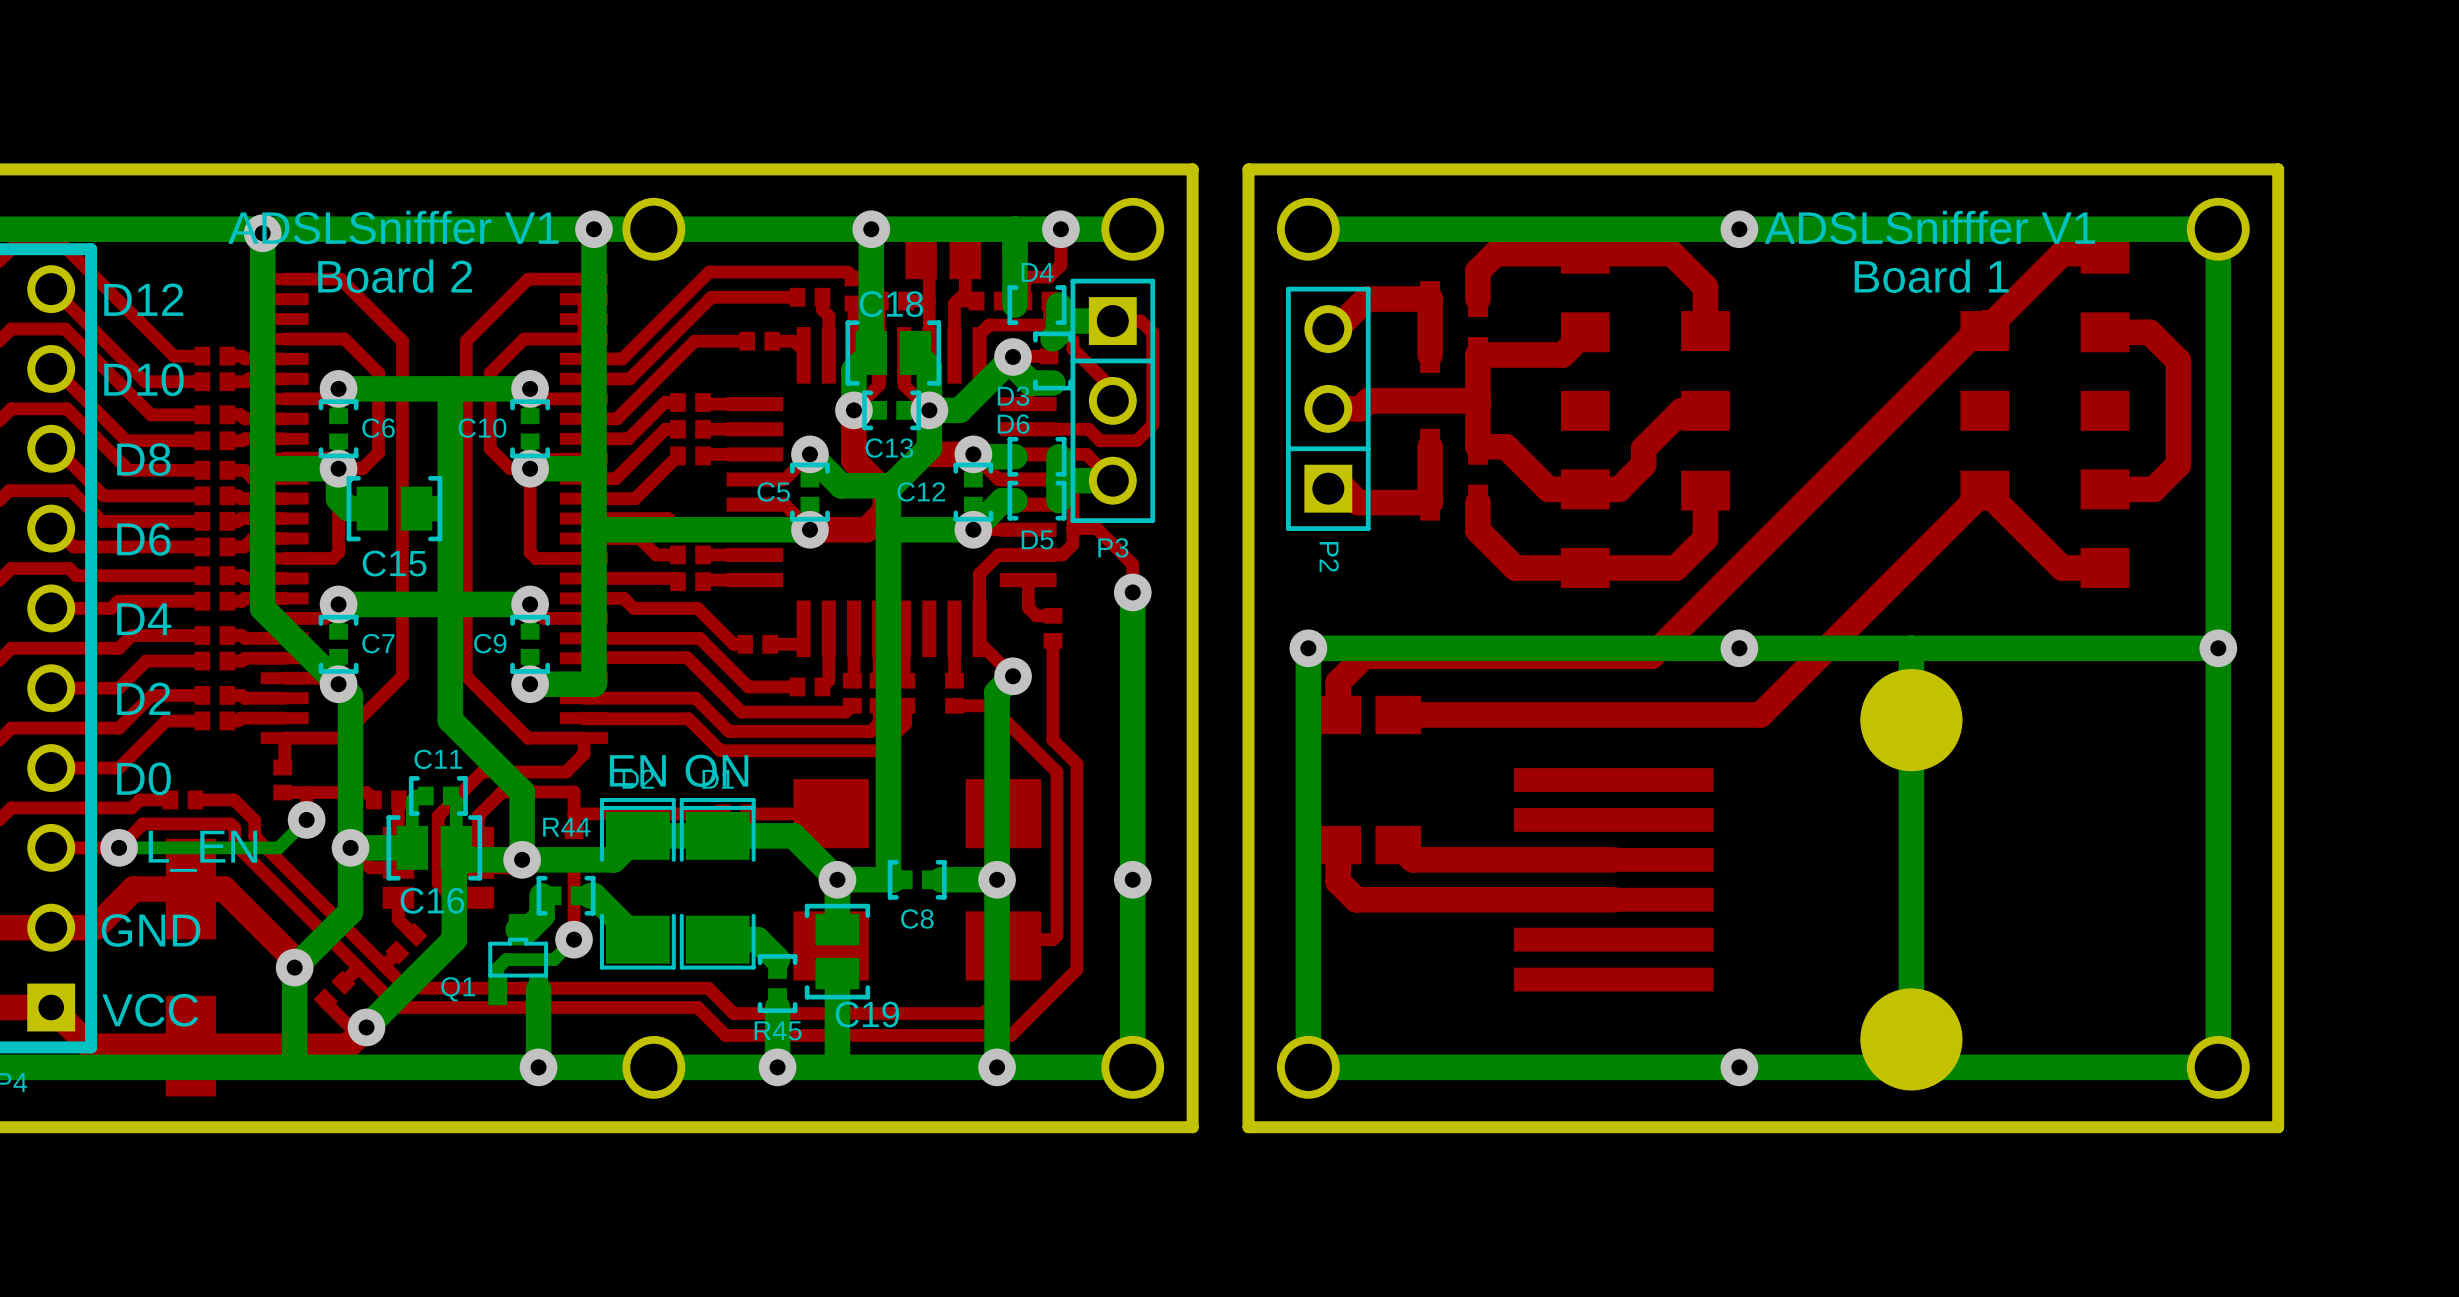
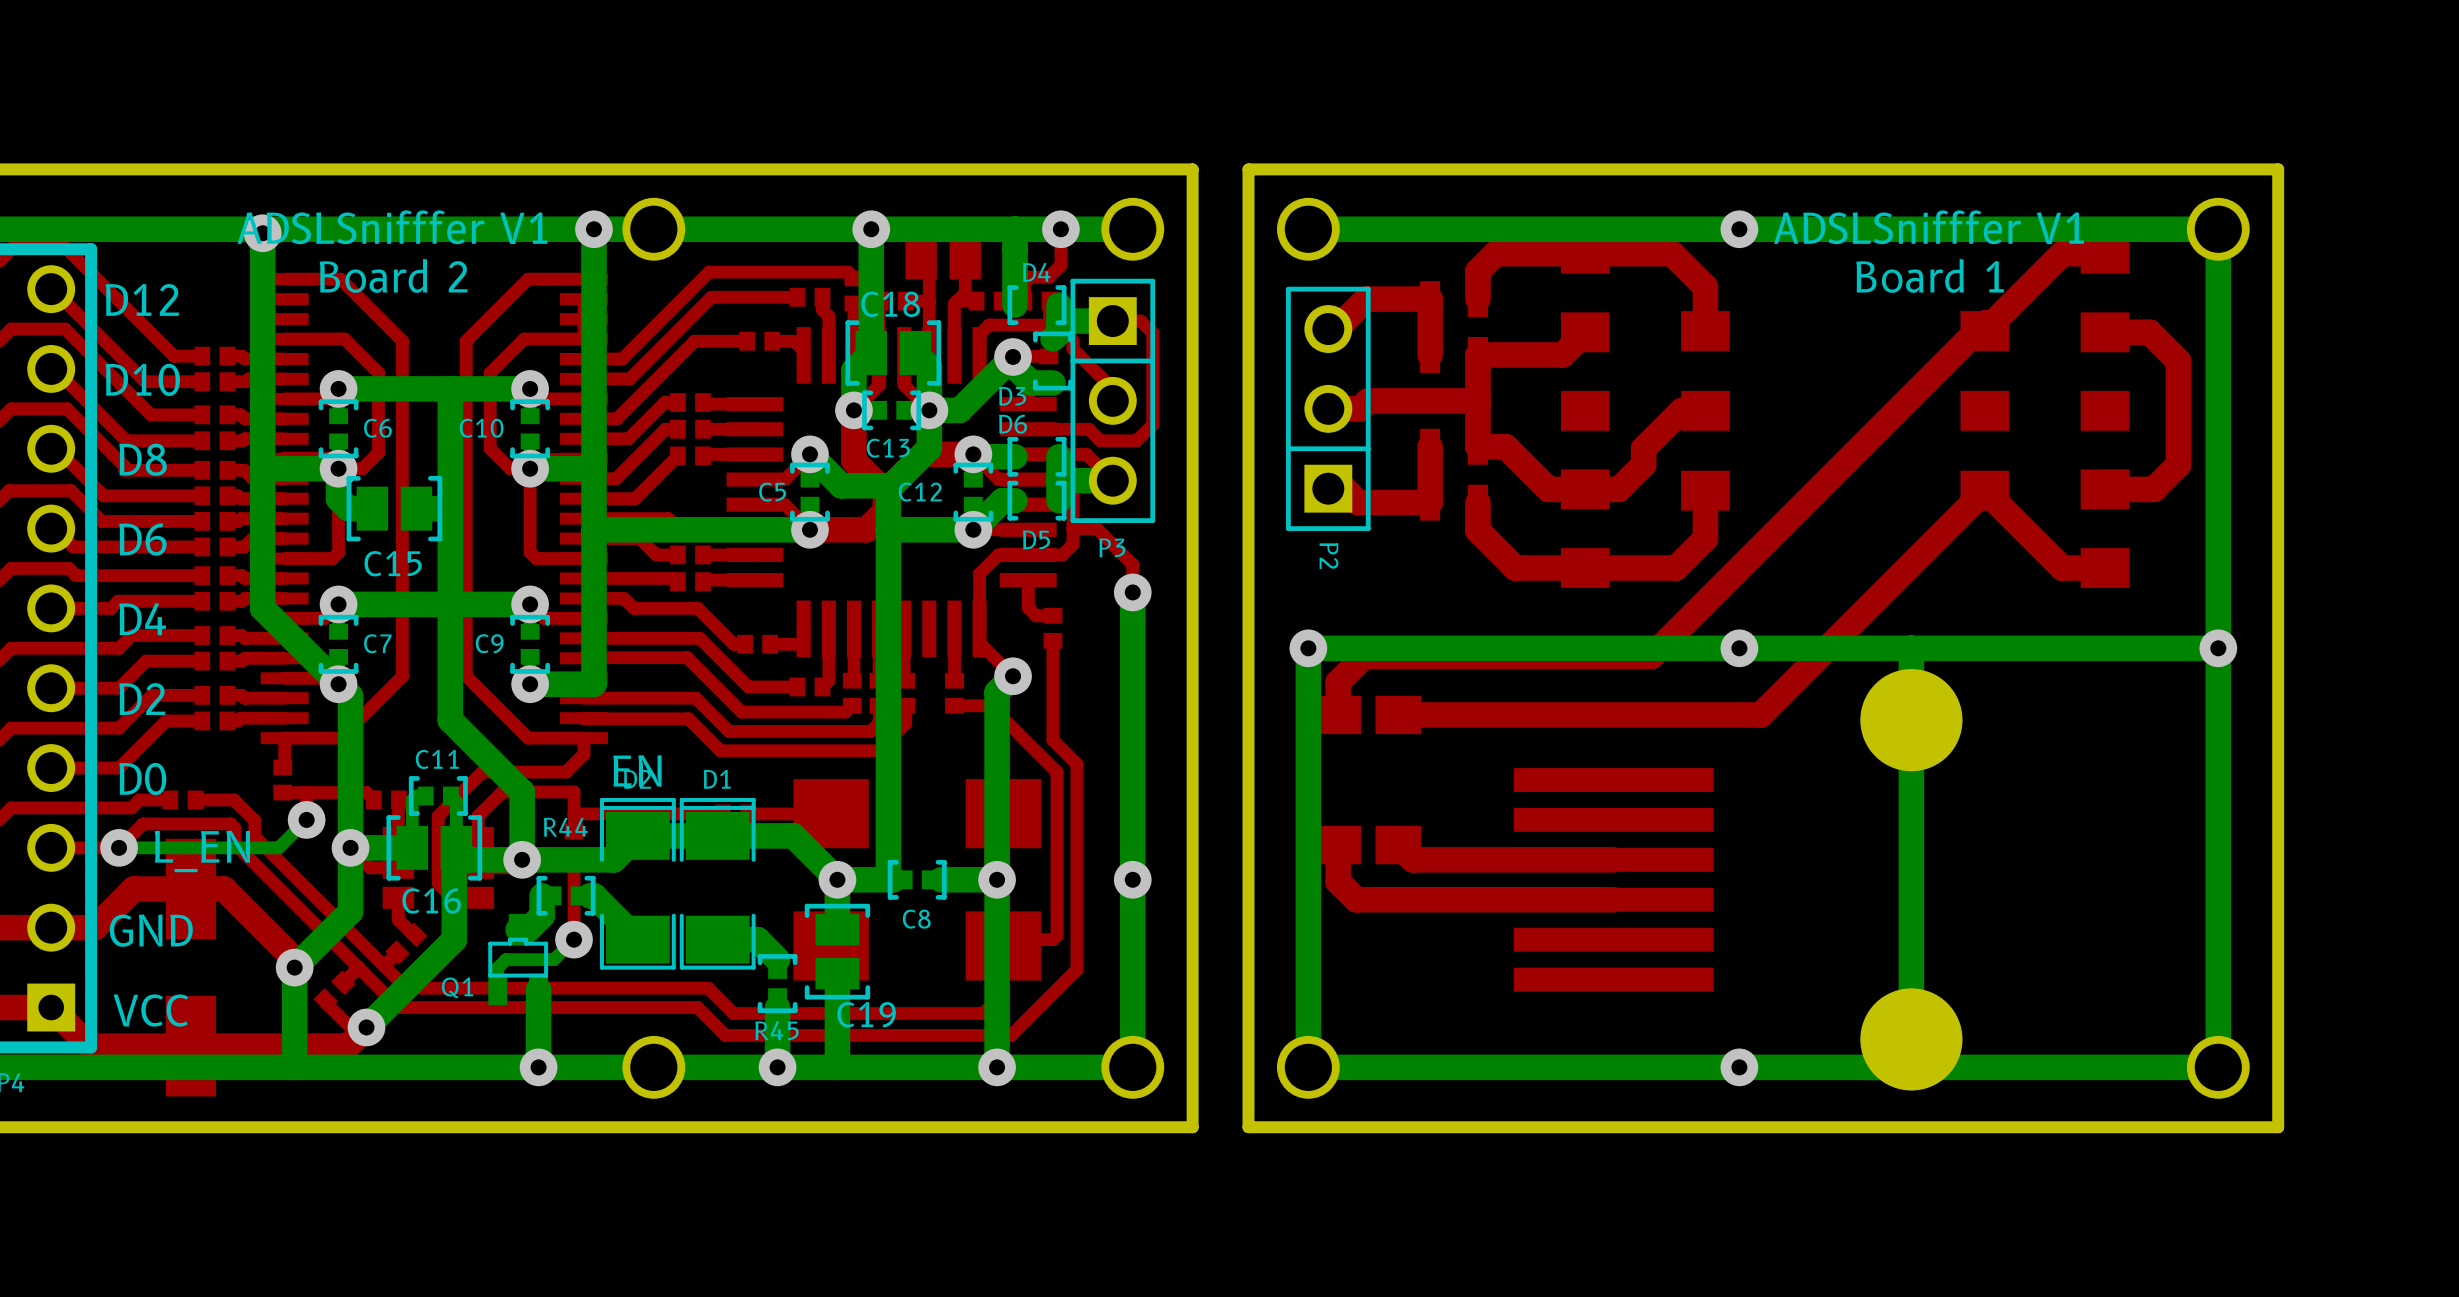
text: ON (716, 770) -> none

